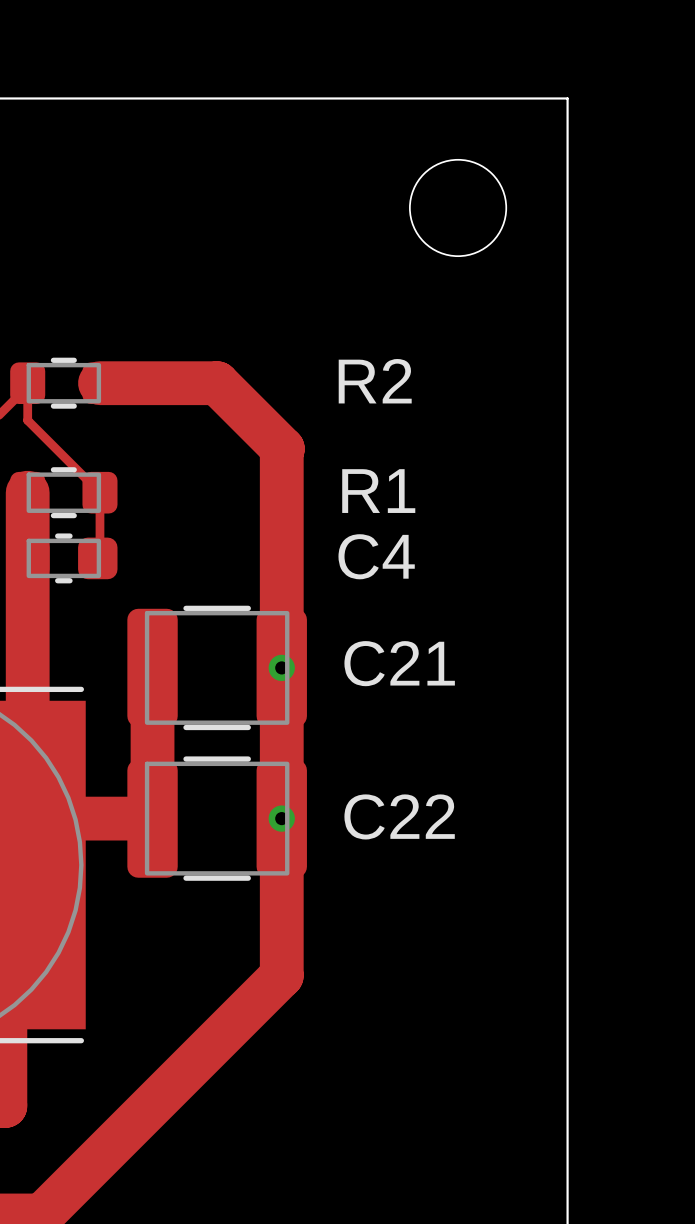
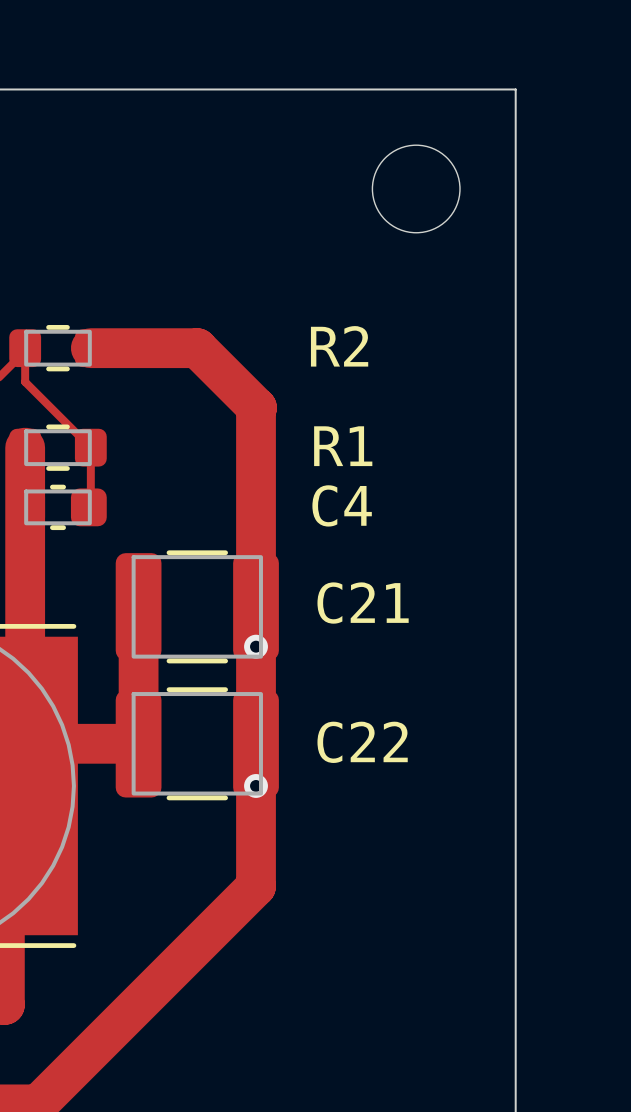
via position: (281, 667) -> (256, 646)
via position: (281, 818) -> (256, 785)

